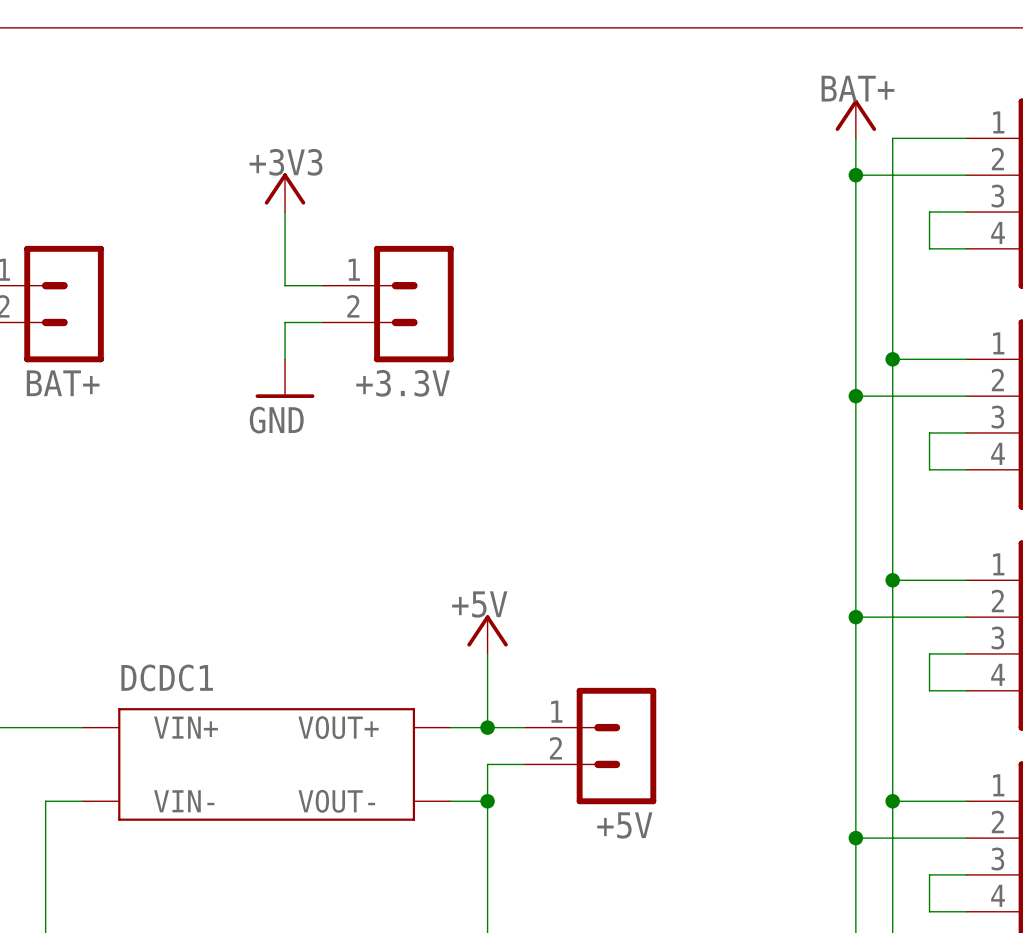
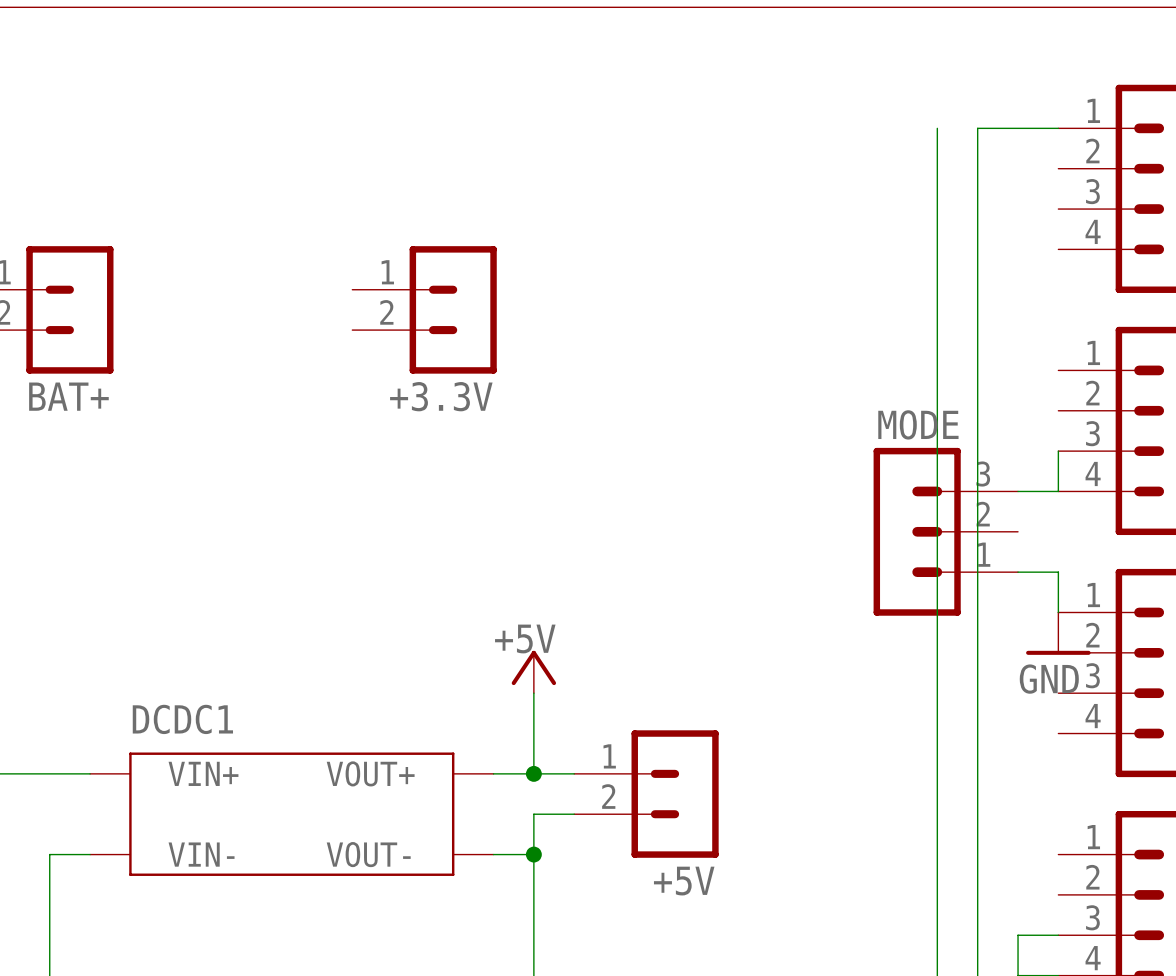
power symbol: BAT+ (855, 119) -> none
wire: (855, 175) (966, 175) -> none
junction: (855, 175) -> none
power symbol: +3V3 (285, 192) -> none
wire: (285, 212) (285, 285) (321, 285) -> none
wire: (966, 212) (929, 212) (929, 248) (966, 248) -> none
wire: (321, 322) (285, 322) (285, 359) -> none
wire: (892, 359) (966, 359) -> none
junction: (892, 359) -> none
power symbol: GND (285, 378) -> none
wire: (855, 396) (966, 396) -> none
junction: (855, 396) -> none
wire: (966, 432) (929, 432) (929, 469) -> (1058, 451) (1058, 491)
MODE: none -> (945, 531)
wire: (892, 580) (966, 580) -> (1018, 572) (1058, 572) (1058, 612)
junction: (892, 580) -> none
power symbol: none -> GND (1058, 633)
wire: (855, 617) (966, 617) -> none
junction: (855, 617) -> none
wire: (966, 653) (929, 653) (929, 690) (966, 690) -> none
wire: (892, 801) (966, 801) -> none
junction: (892, 801) -> none
wire: (855, 838) (966, 838) -> none
junction: (855, 838) -> none

